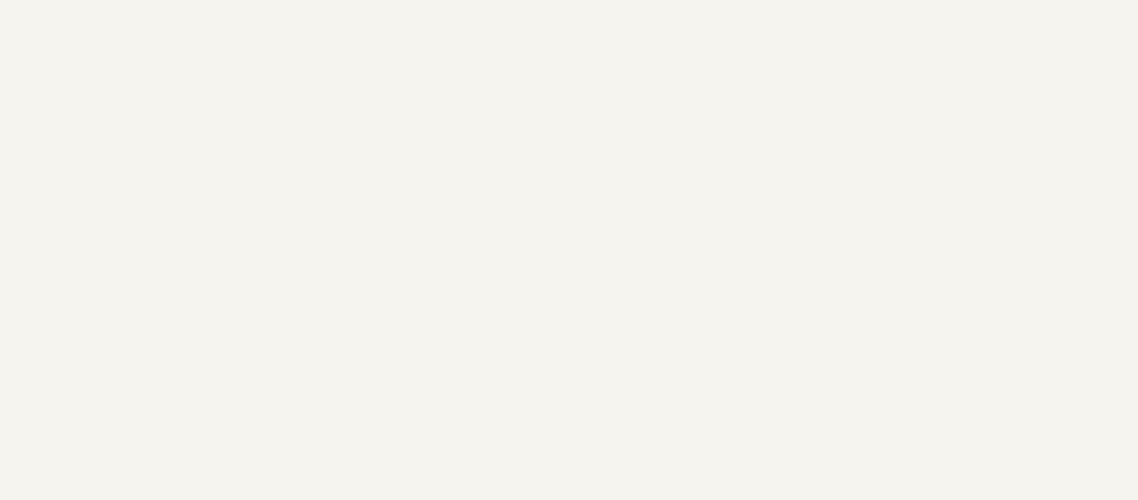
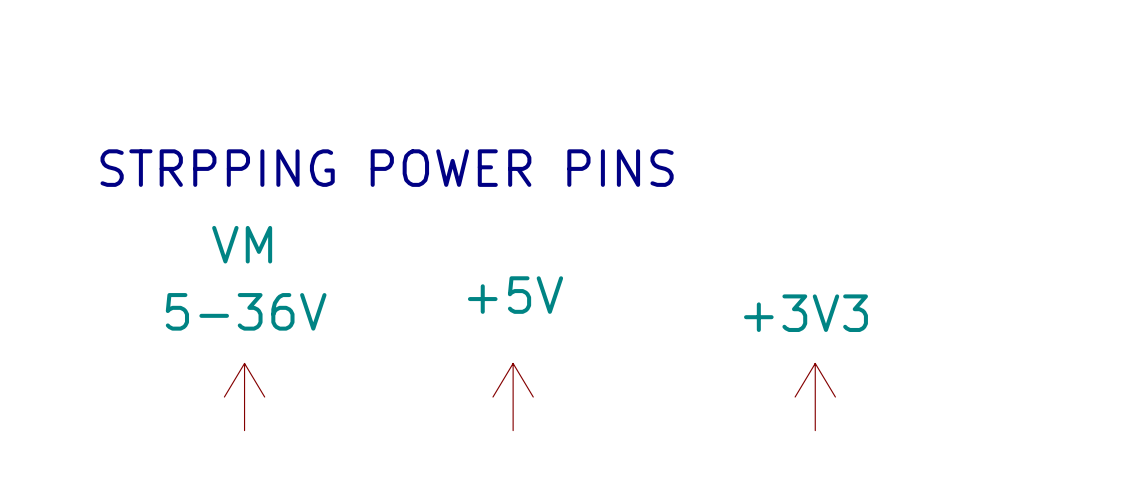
text: none -> STRPPING POWER PINS (387, 168)
power symbol: none -> VM (244, 397)
power symbol: none -> +5V (513, 397)
power symbol: none -> +3V3 (815, 397)

